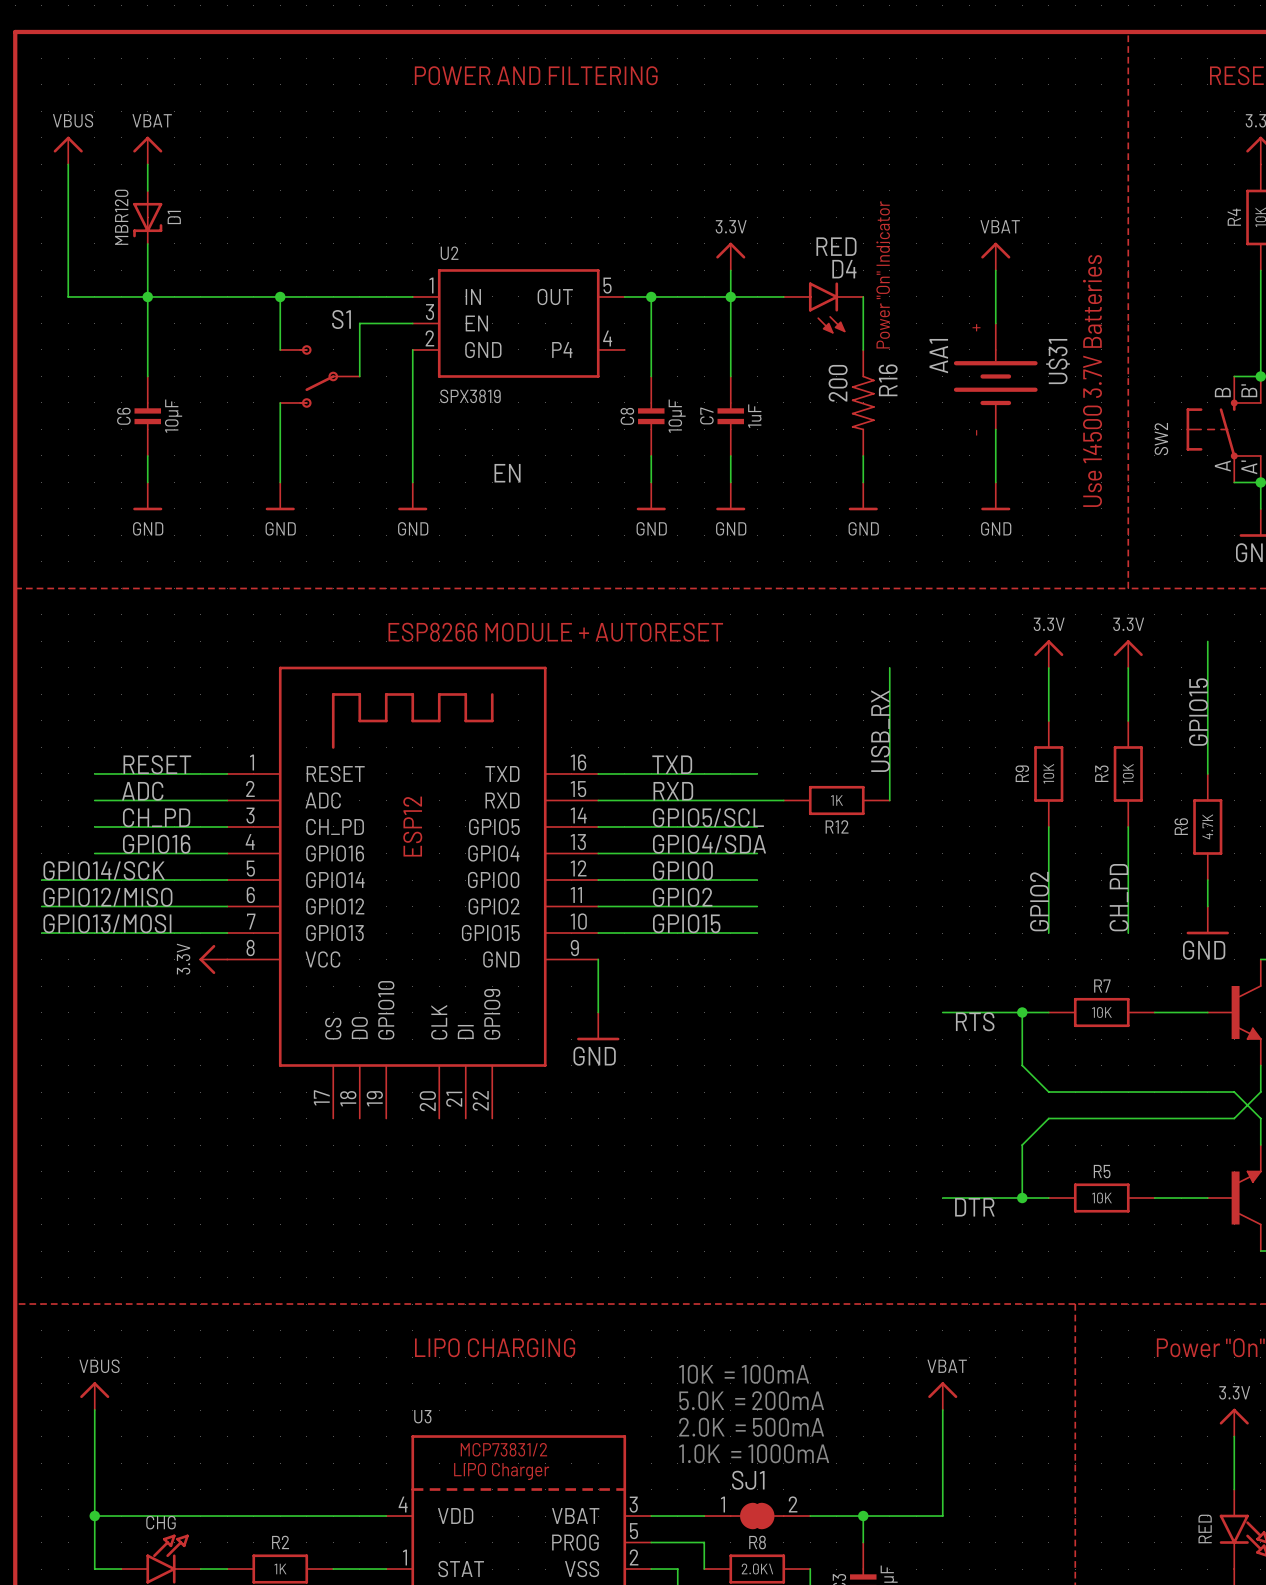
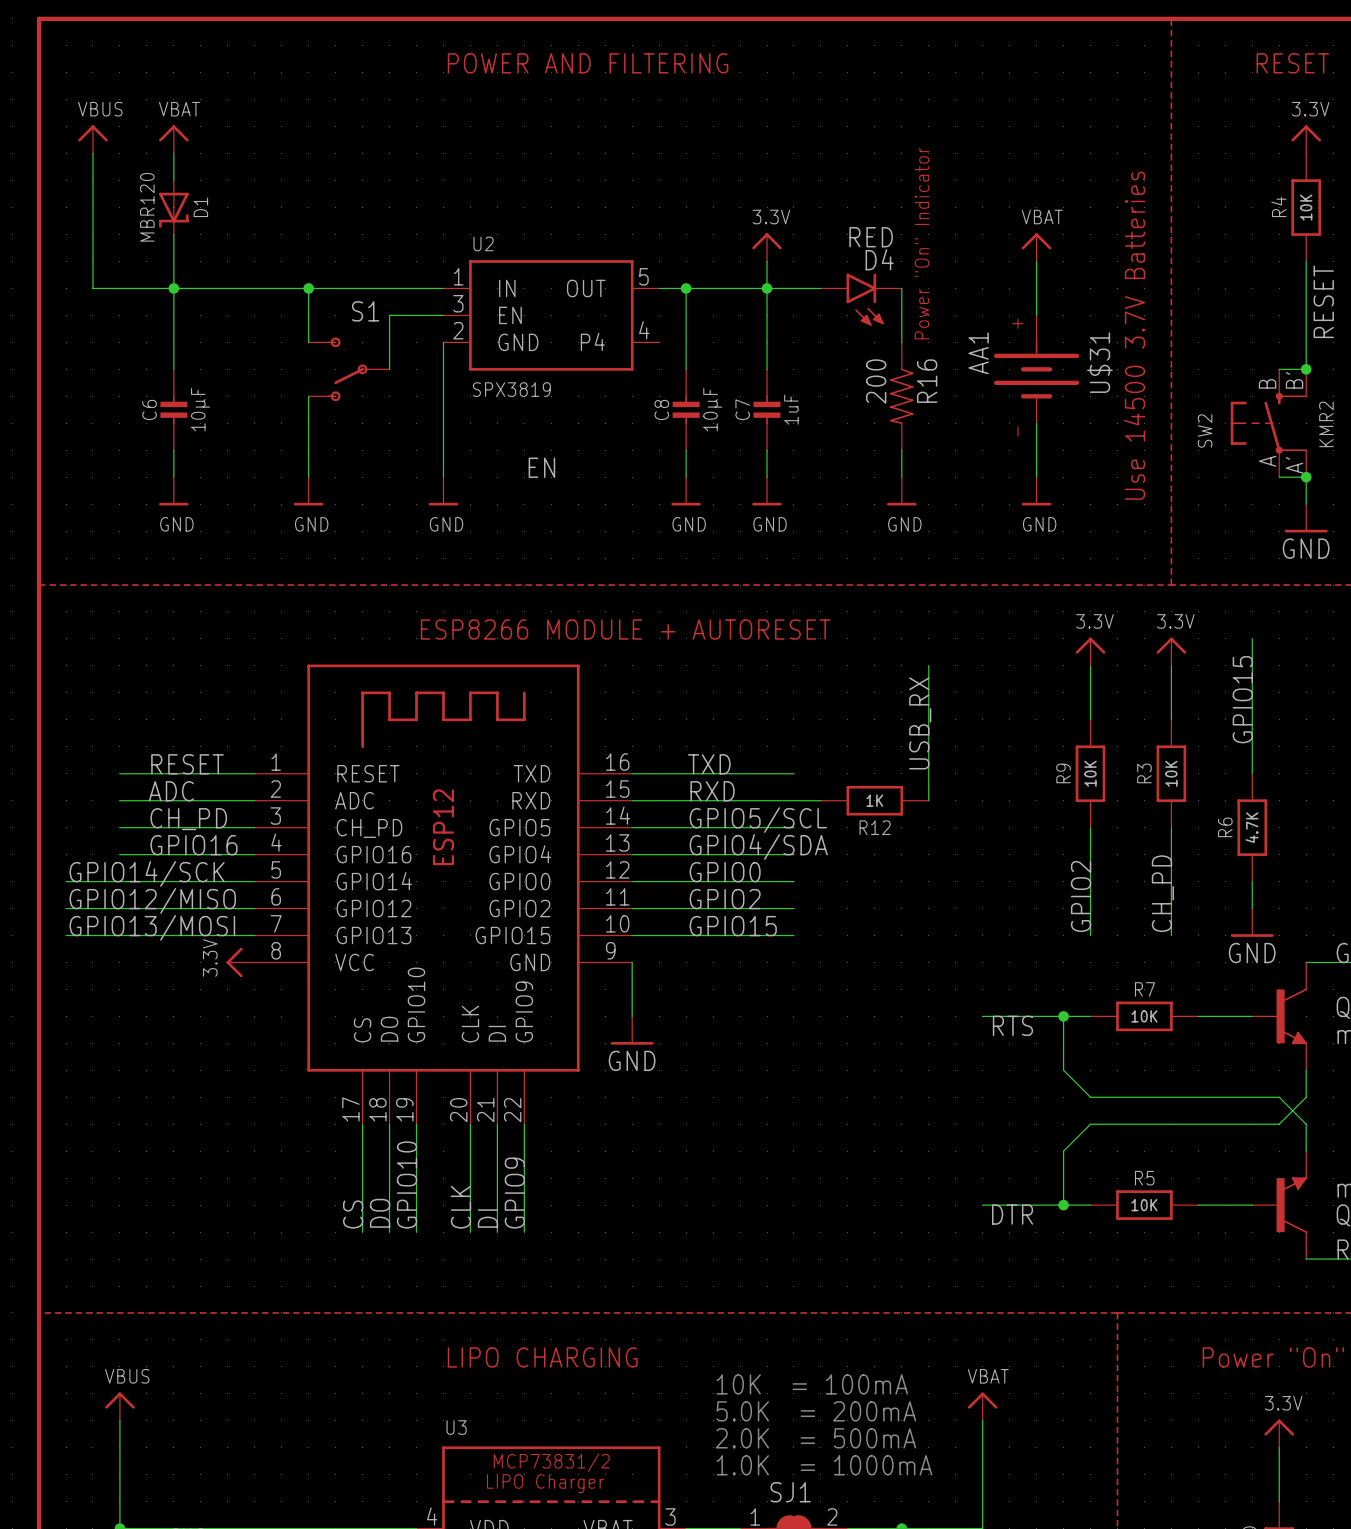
wire: none -> (362, 1124) (362, 1232)
wire: none -> (389, 1124) (389, 1232)
wire: none -> (416, 1124) (416, 1232)
wire: none -> (470, 1124) (470, 1232)
wire: none -> (497, 1124) (497, 1232)
wire: none -> (524, 1124) (524, 1232)
label: none -> GPIO10 (407, 1184)
label: none -> GPIO9 (514, 1193)
label: none -> CLK (460, 1207)
label: none -> DO (380, 1213)
label: none -> CS (353, 1214)
label: none -> DI (487, 1218)

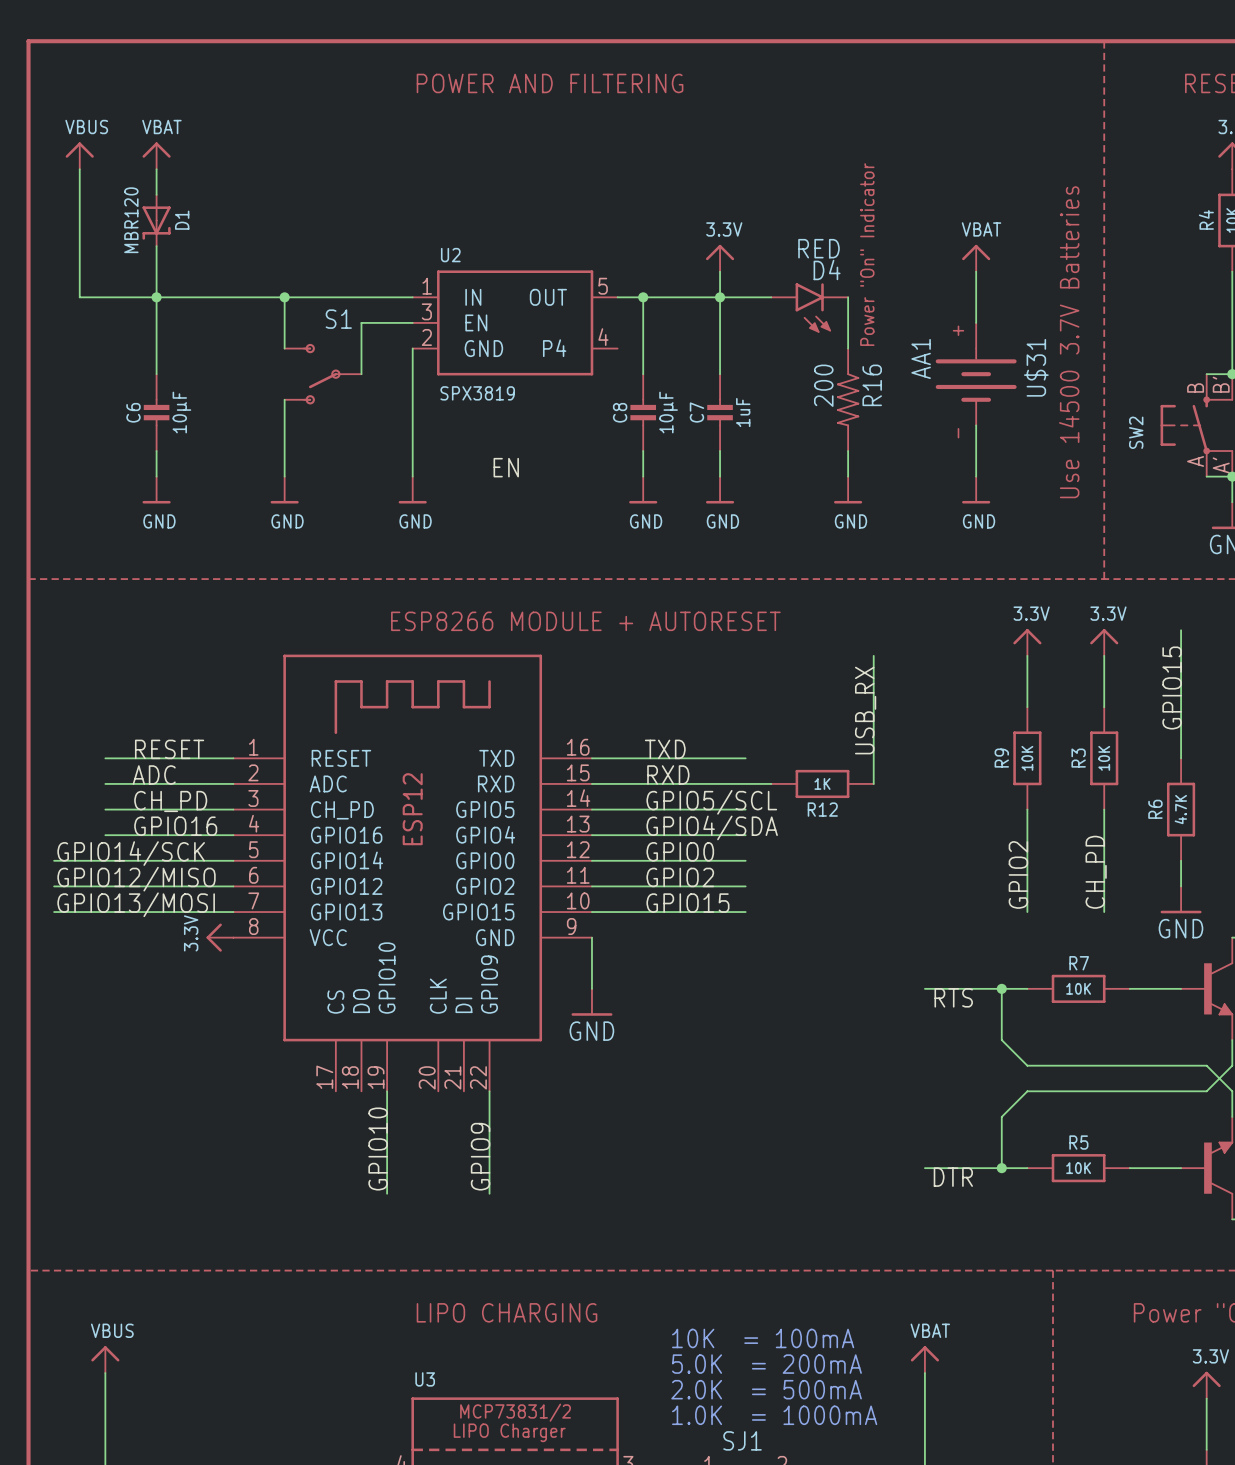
wire: (362, 1124) (362, 1232) -> none
wire: (389, 1124) (389, 1232) -> none
wire: (470, 1124) (470, 1232) -> none
wire: (497, 1124) (497, 1232) -> none
label: CLK (460, 1207) -> none
label: DO (380, 1213) -> none
label: CS (353, 1214) -> none
label: DI (487, 1218) -> none

